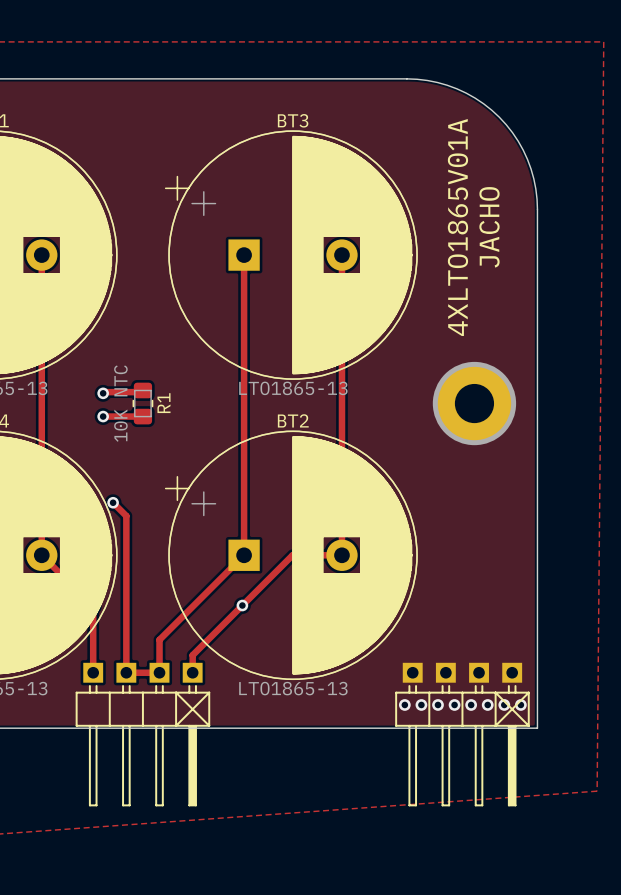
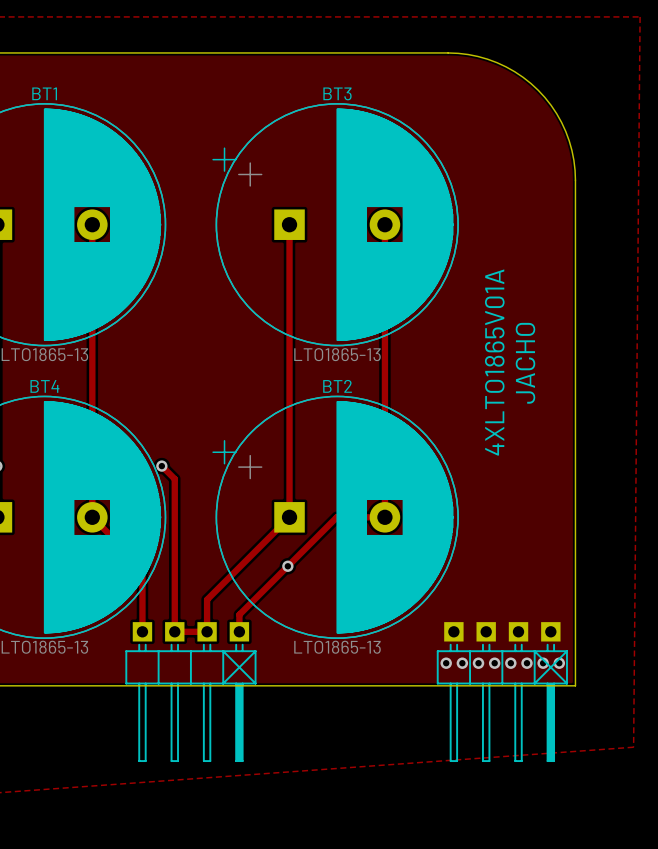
text position: 4XLTO1865V01A (457, 227) -> 4XLTO1865V01A (494, 362)
text position: JACHO (489, 227) -> JACHO (525, 363)
track: (142, 392) (103, 393) -> none
via: (103, 393) -> none
R1: 10K NTC (142, 403) -> none
part: (474, 403) -> none
track: (103, 416) (141, 416) (142, 418) -> none
via: (103, 416) -> none

